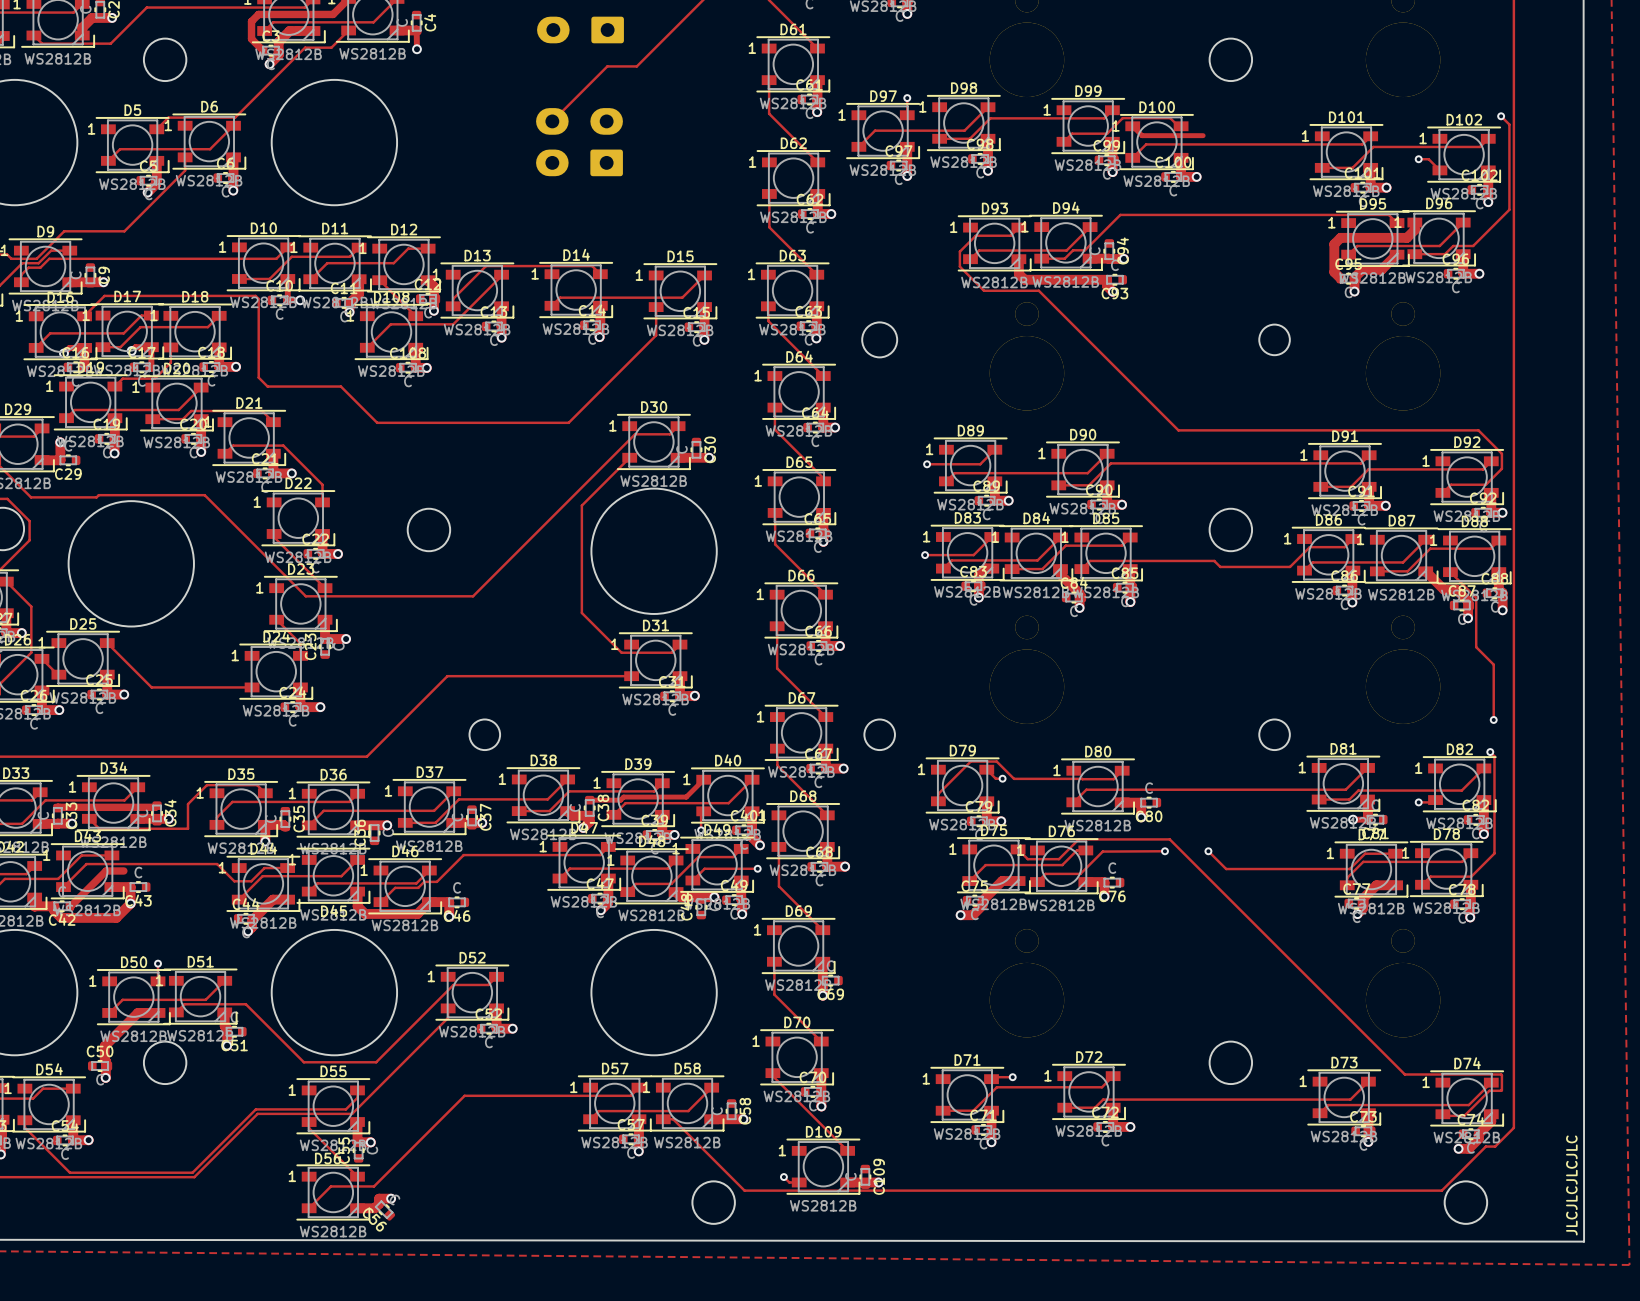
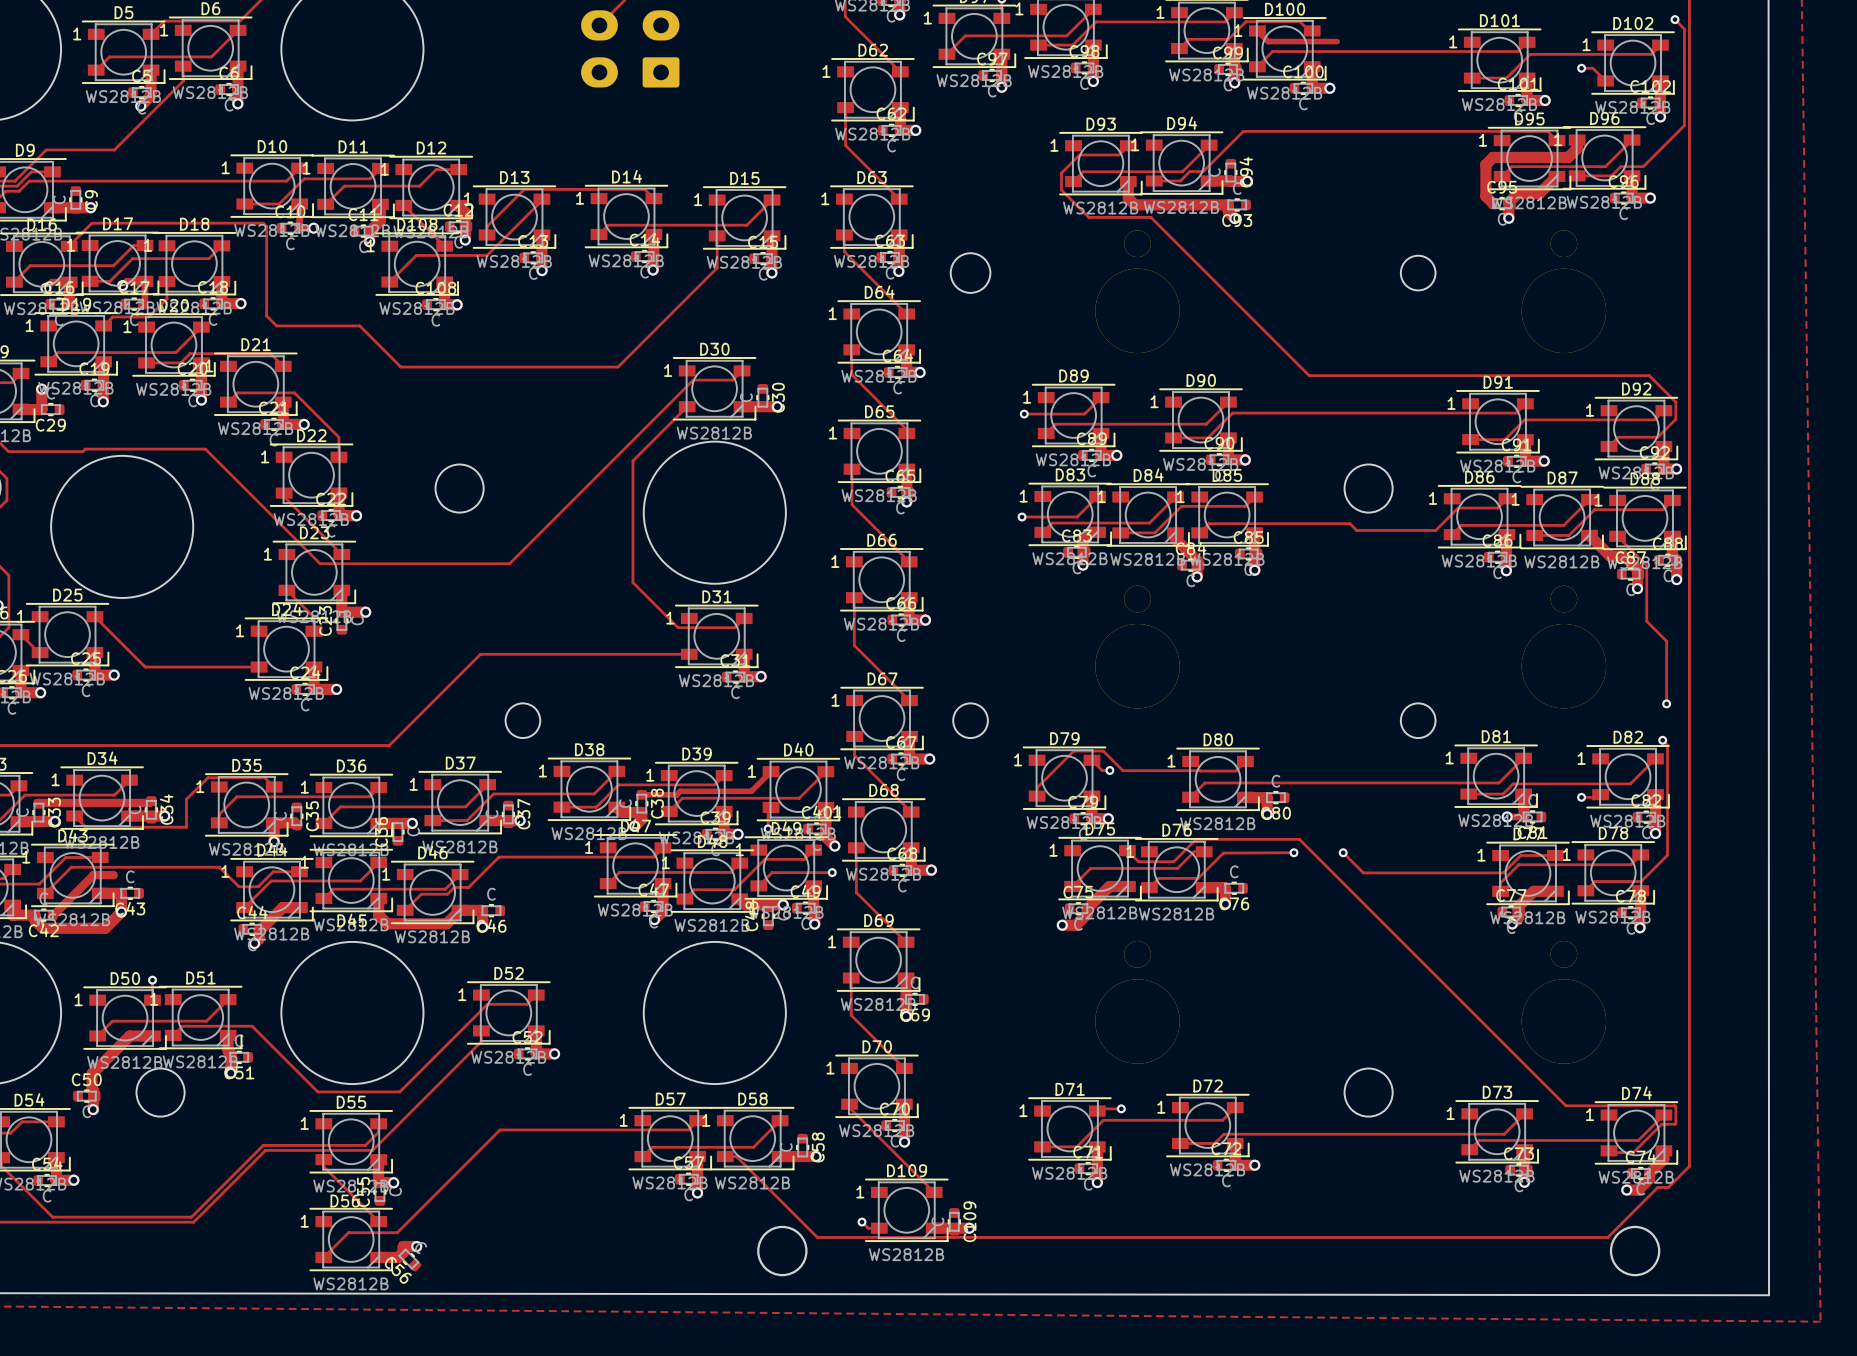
text: JLCJLCJLCJLC (1571, 1185) -> none

